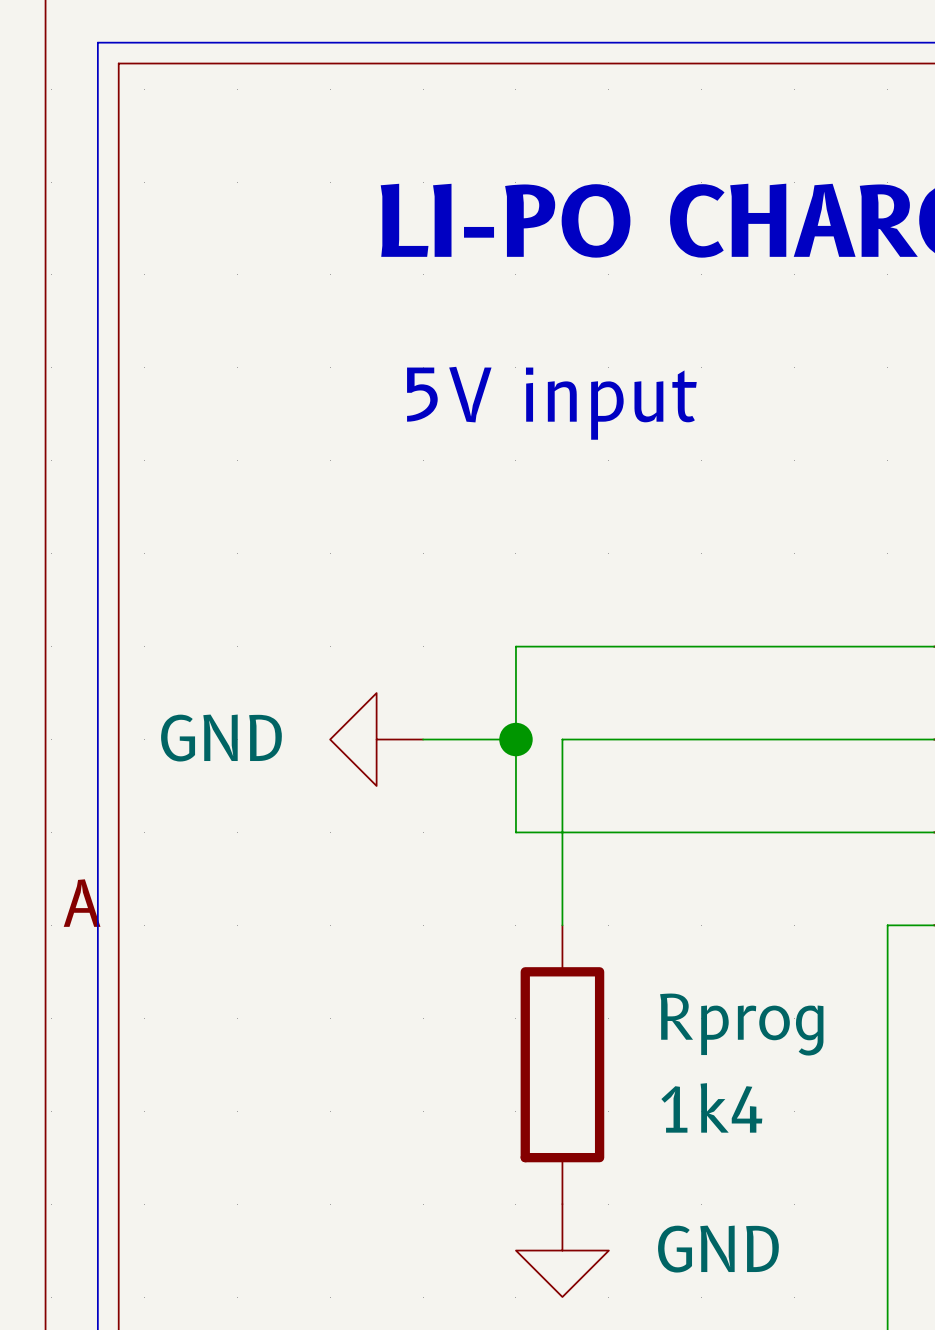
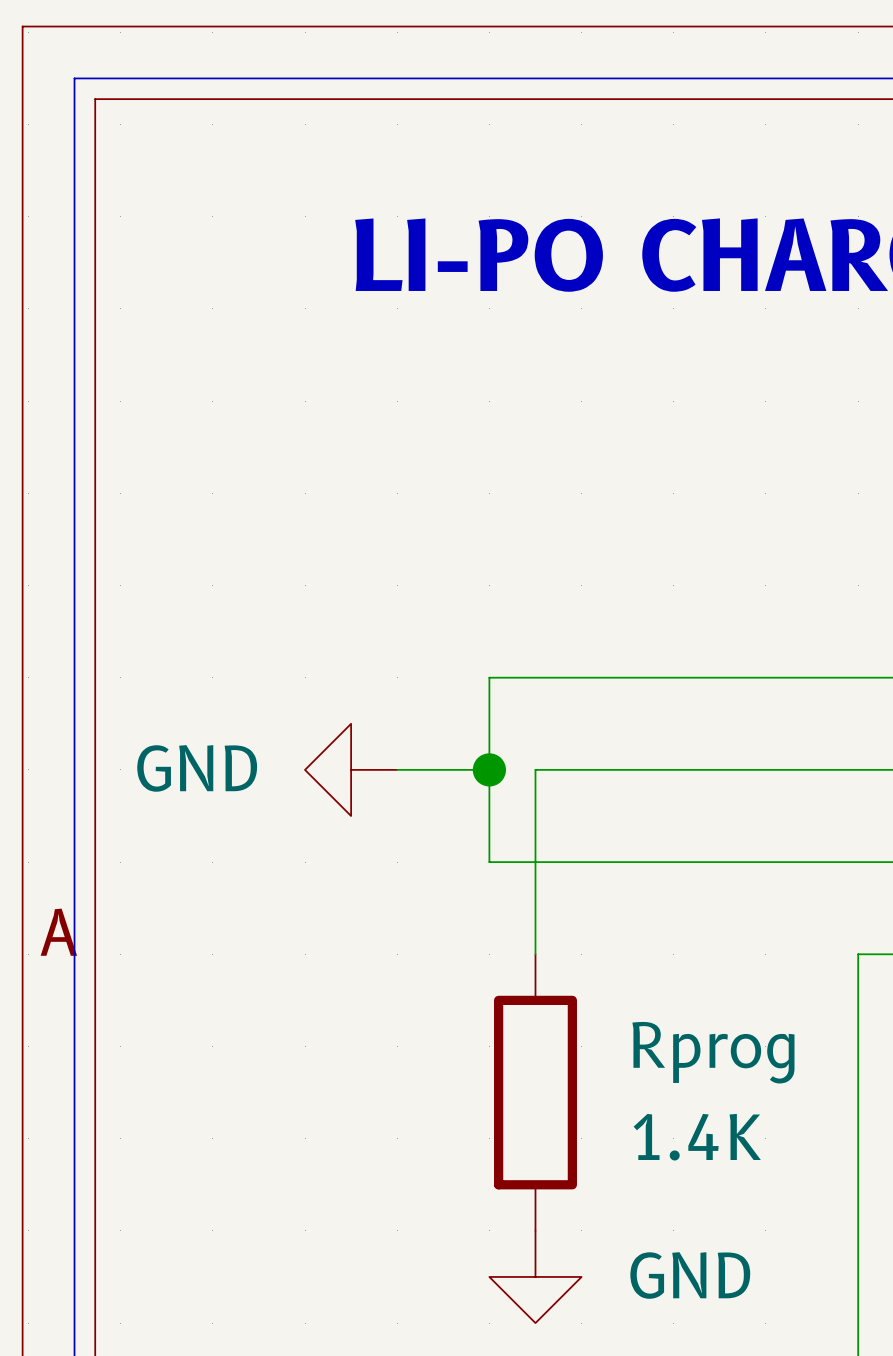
text: 5V input (551, 403) -> none
Rprog value: 1k4 (711, 1107) -> 1.4K (697, 1137)

